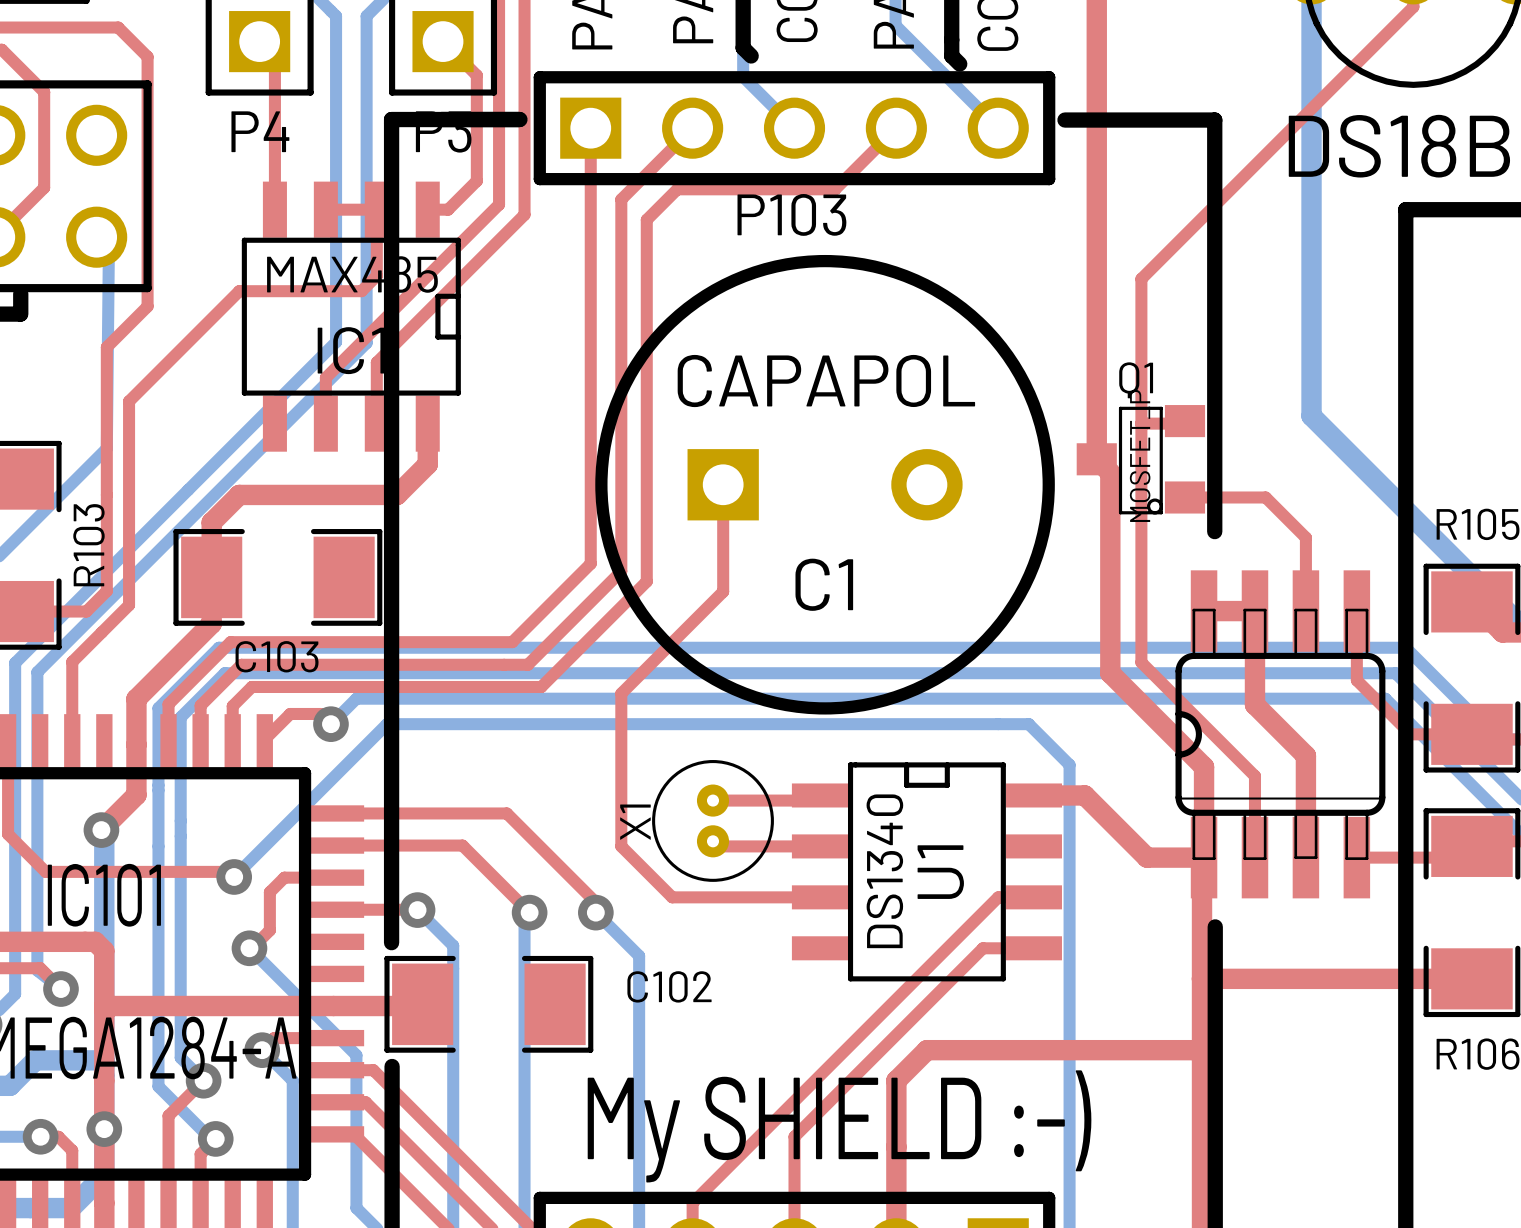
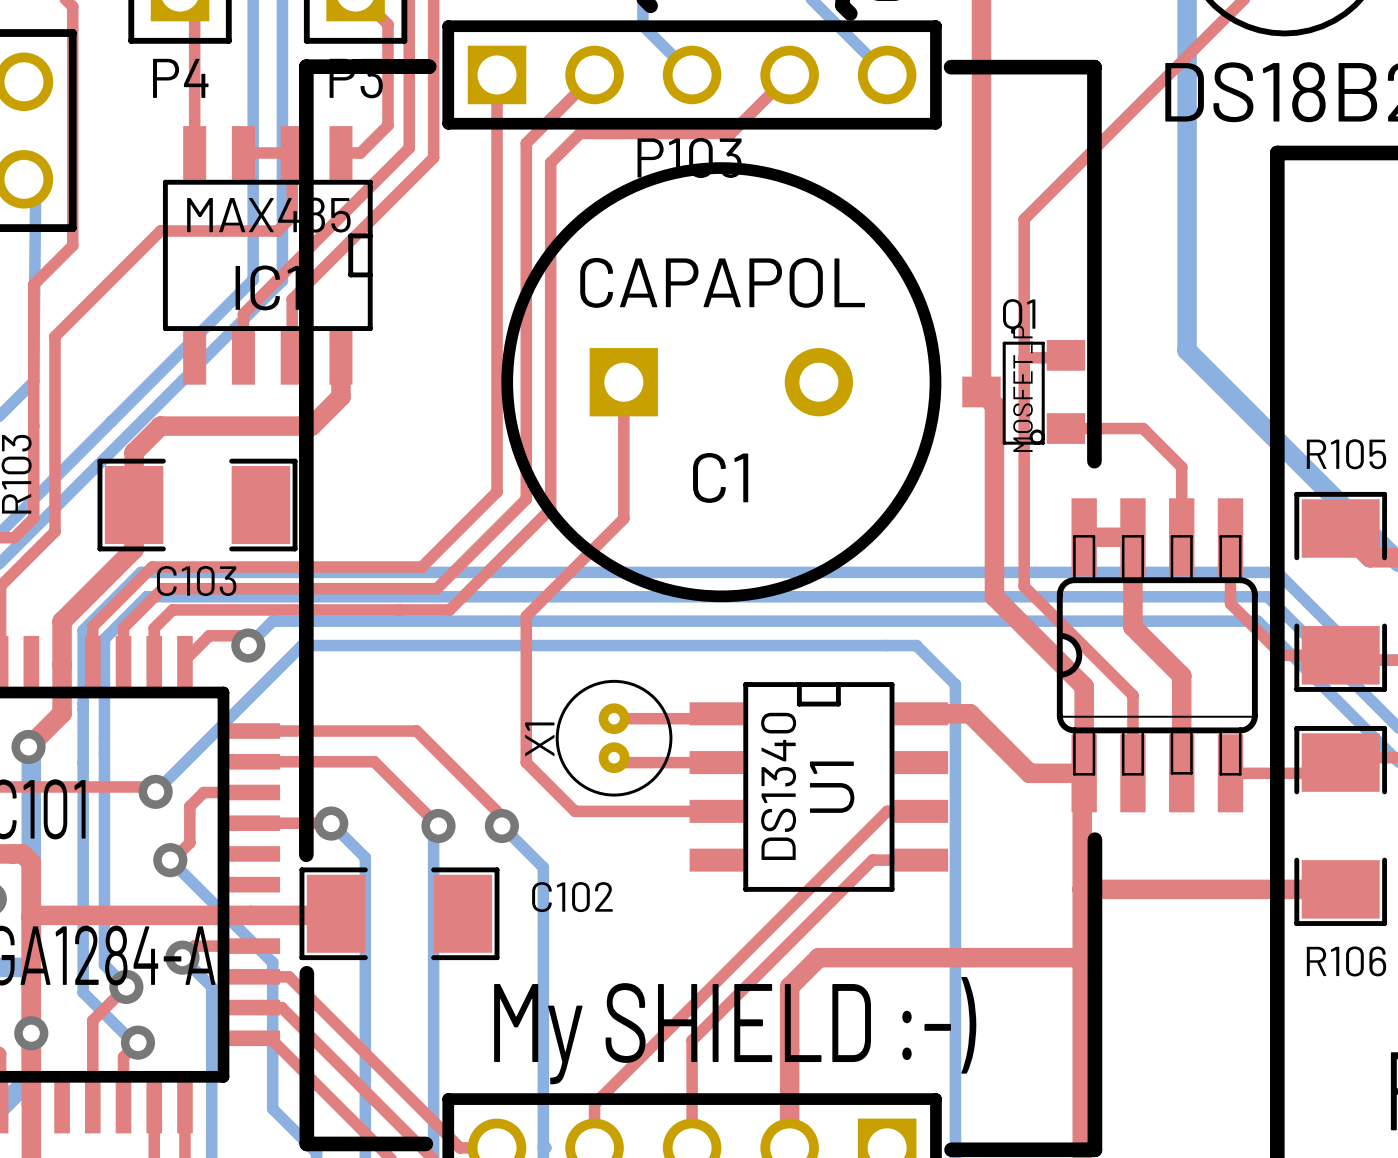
C1 position: (825, 484) -> (721, 382)

